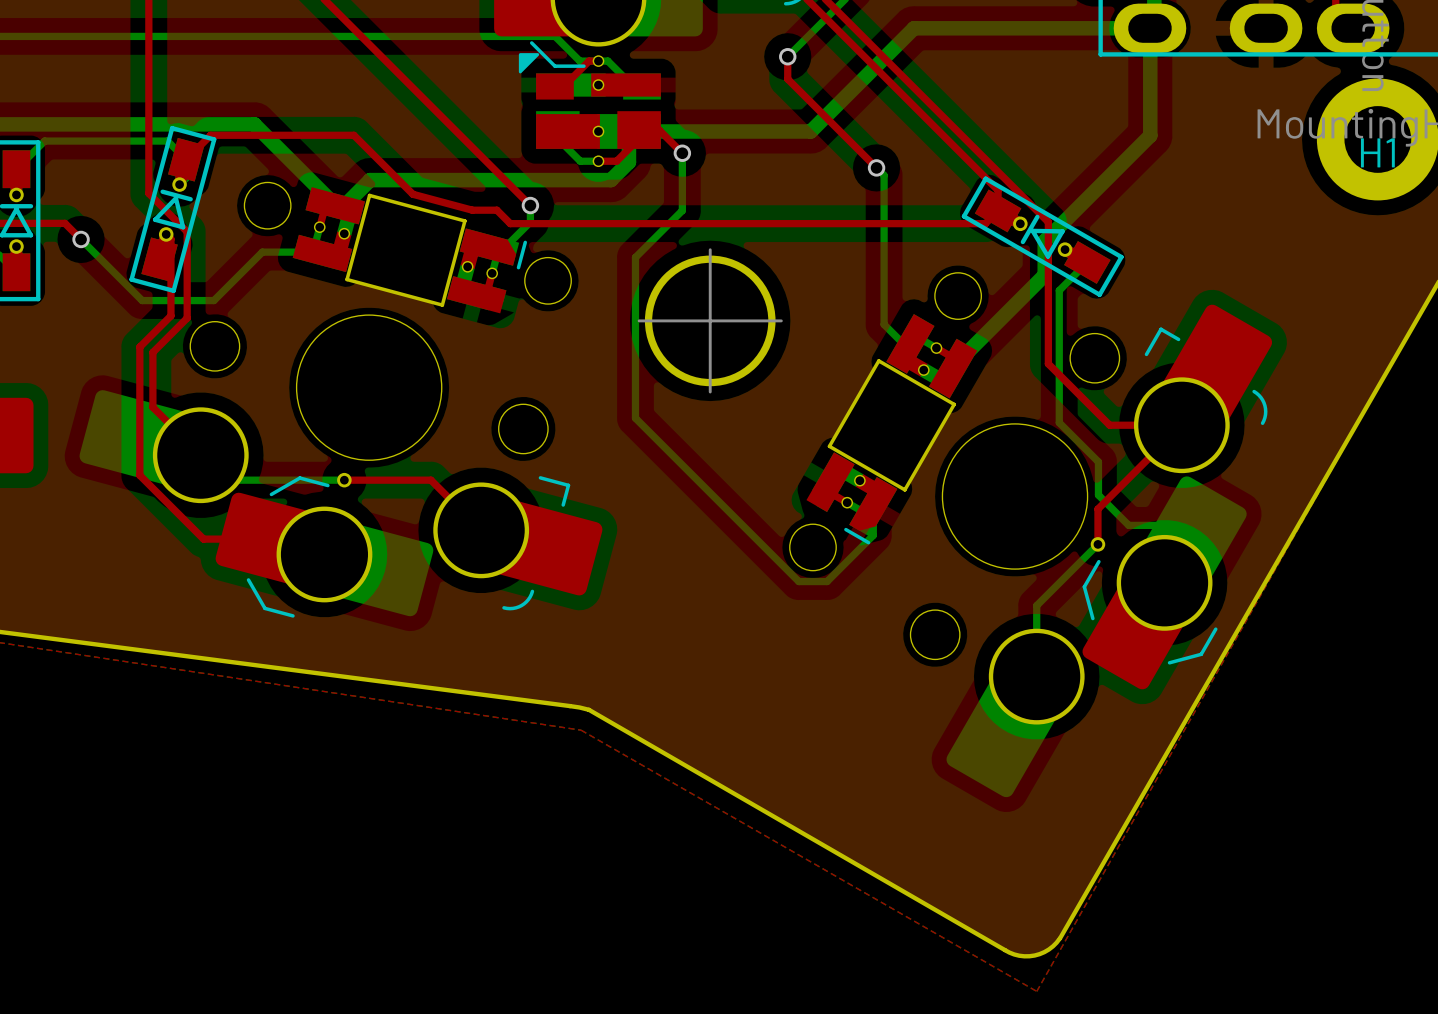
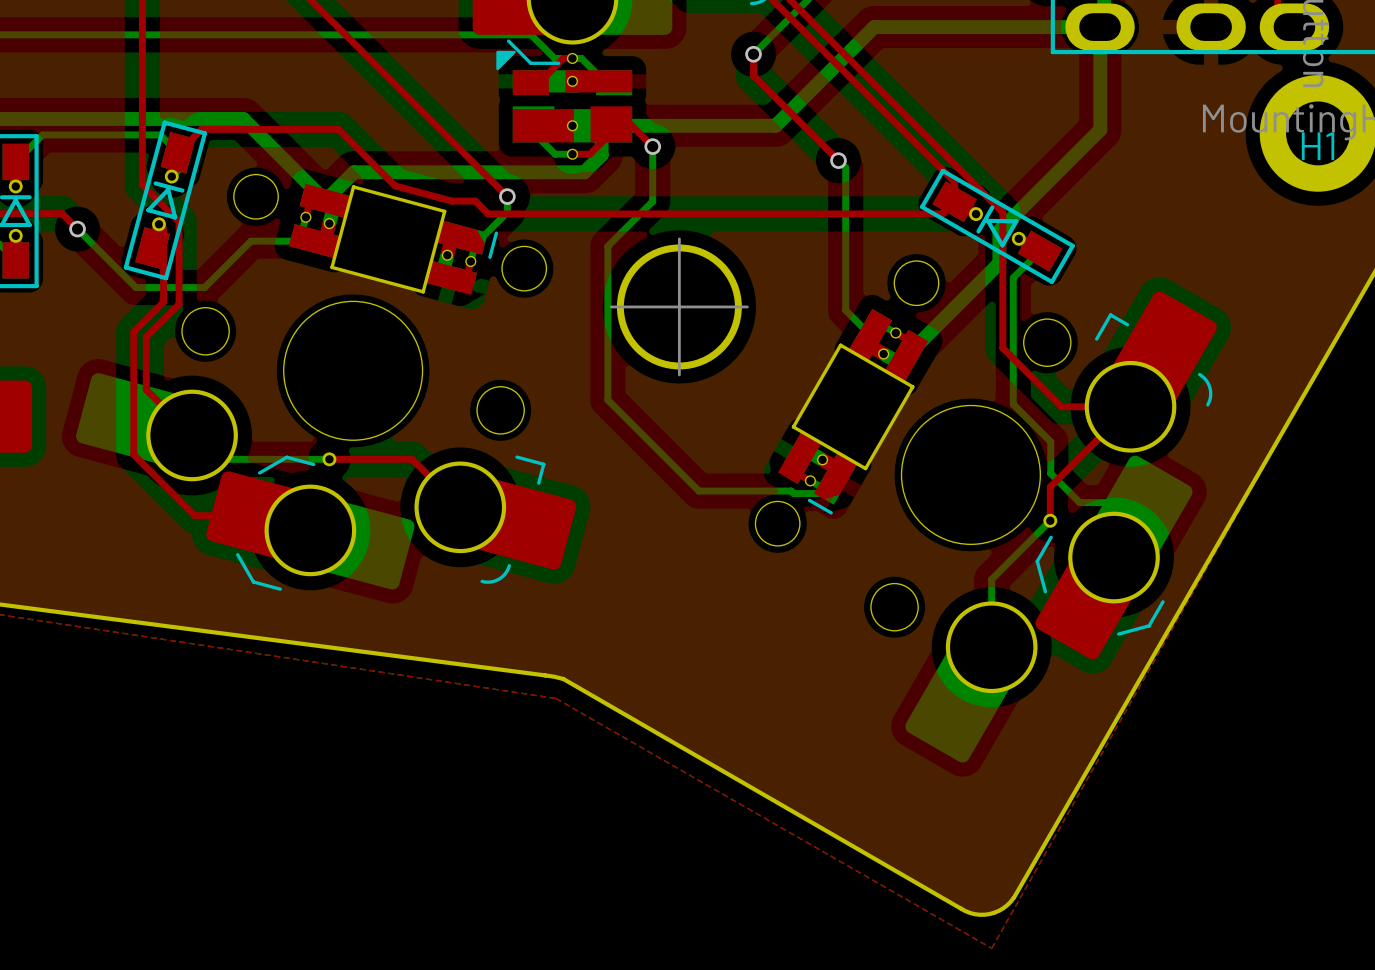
part footprint: [292, 187, 528, 314] -> [288, 183, 499, 295]
part footprint: [806, 314, 978, 545] -> [778, 309, 929, 515]
bottom track: (873, 500) (873, 535) (827, 581) (798, 581) (730, 513) -> (835, 478) (820, 493) (793, 493) (791, 491) (698, 491)

